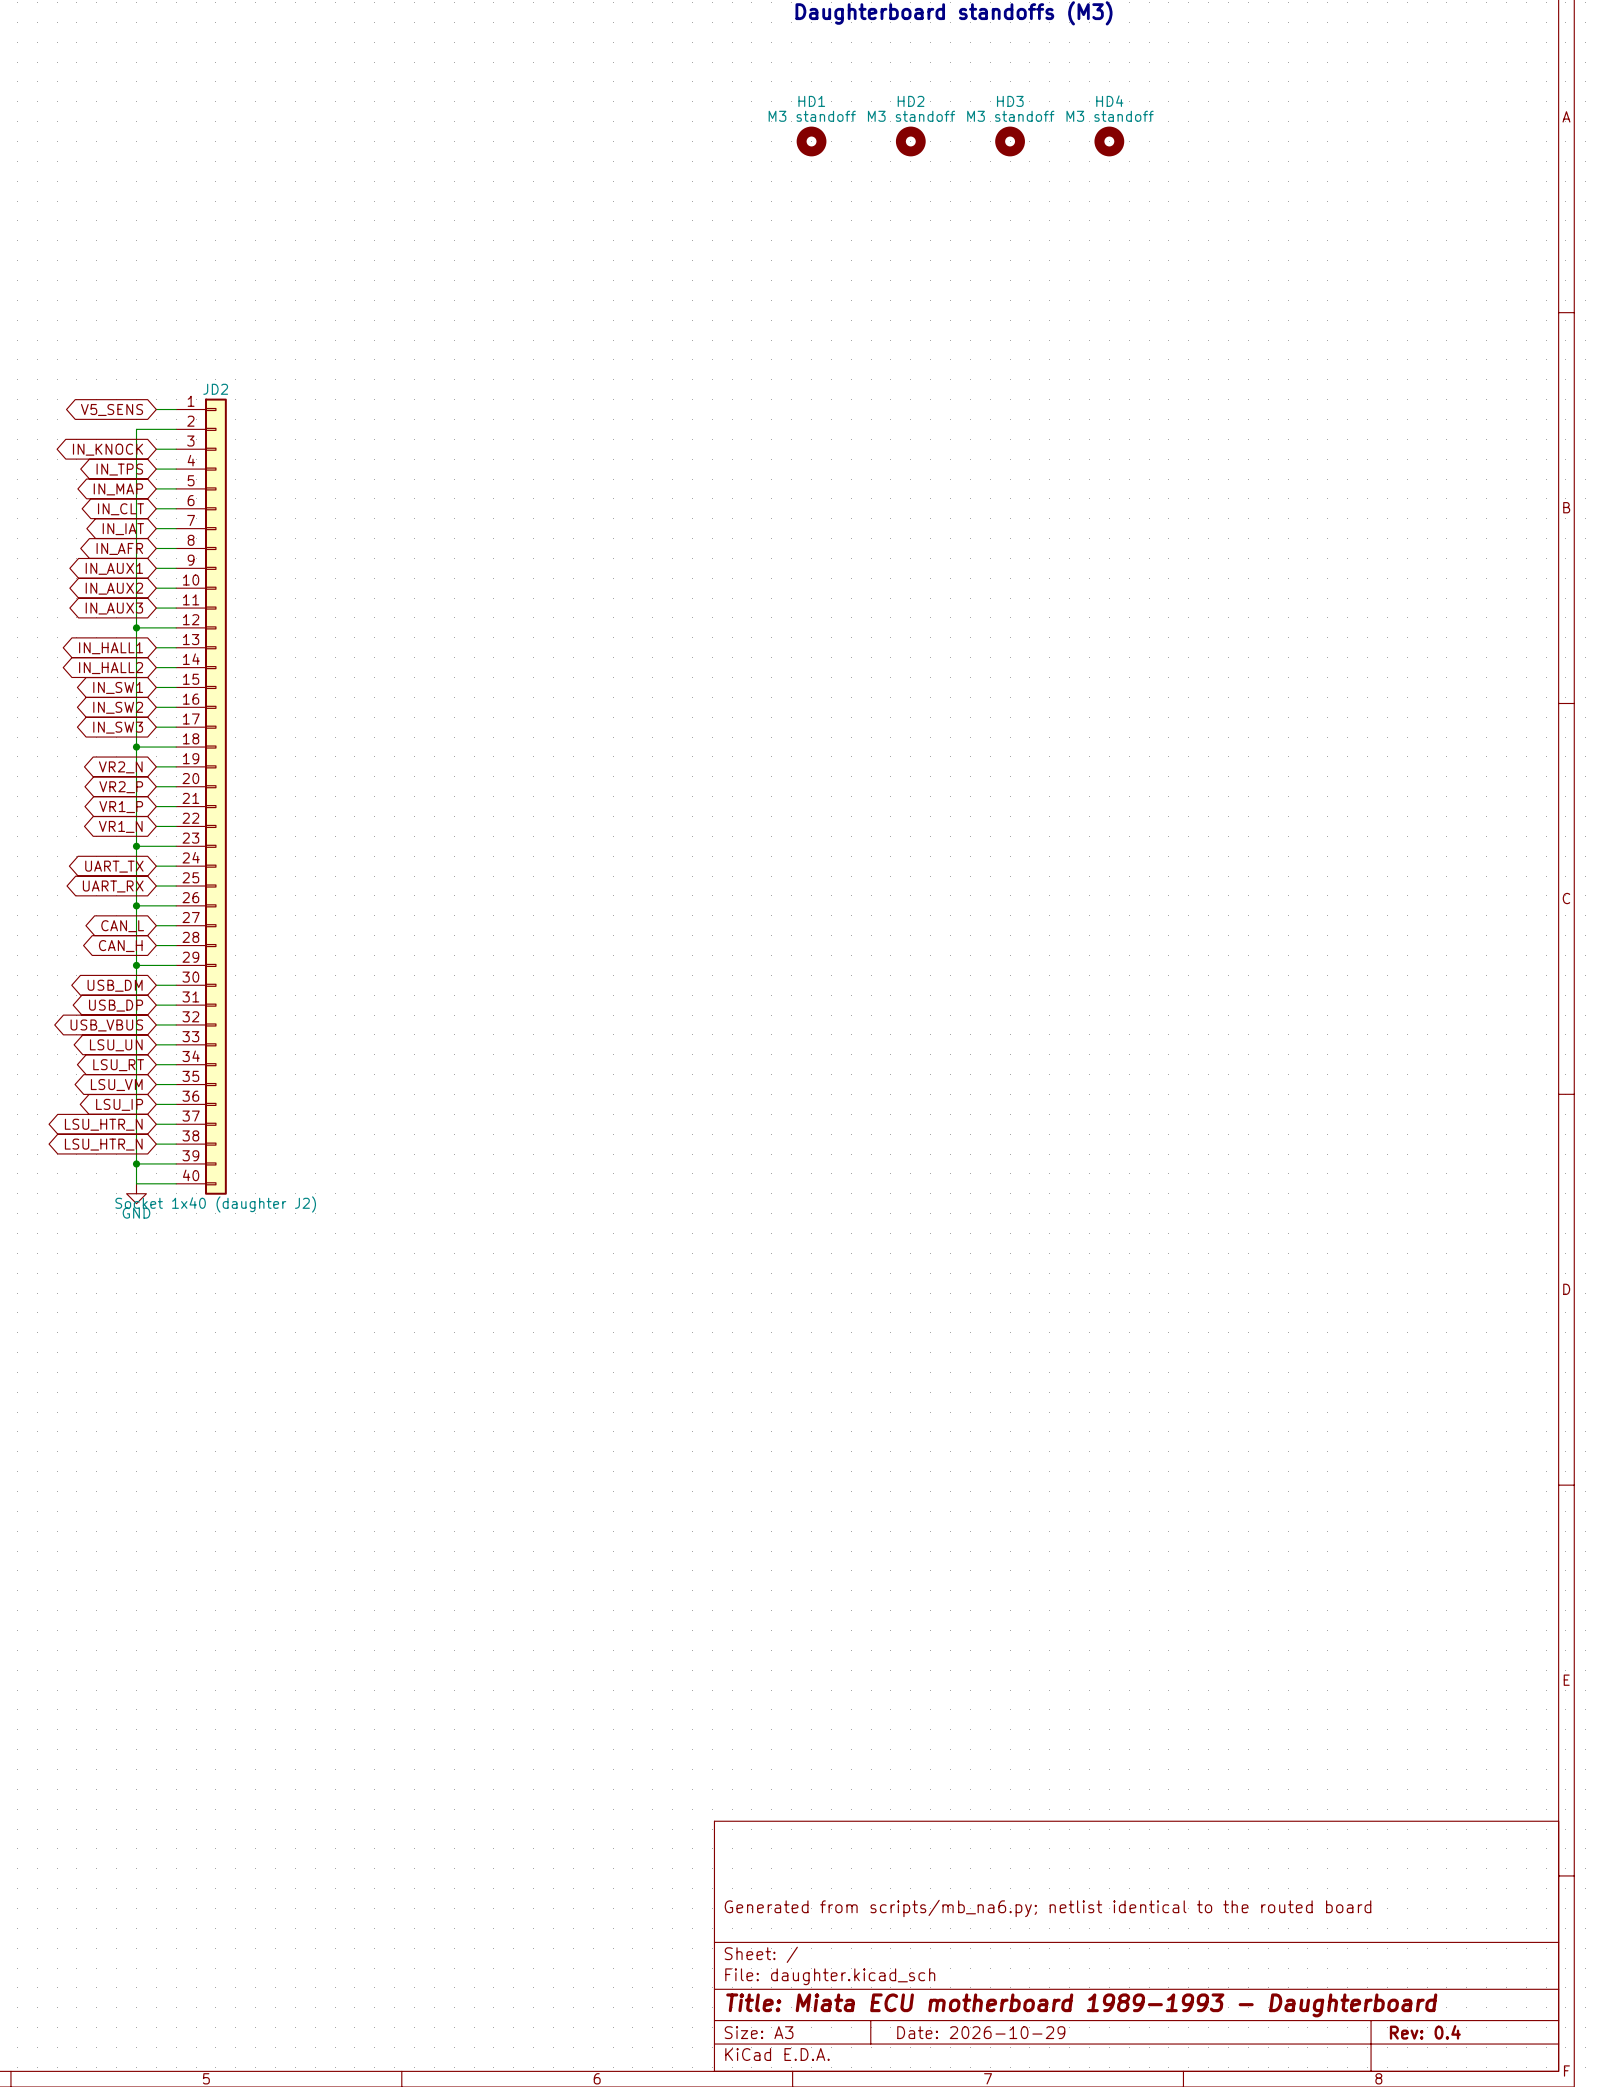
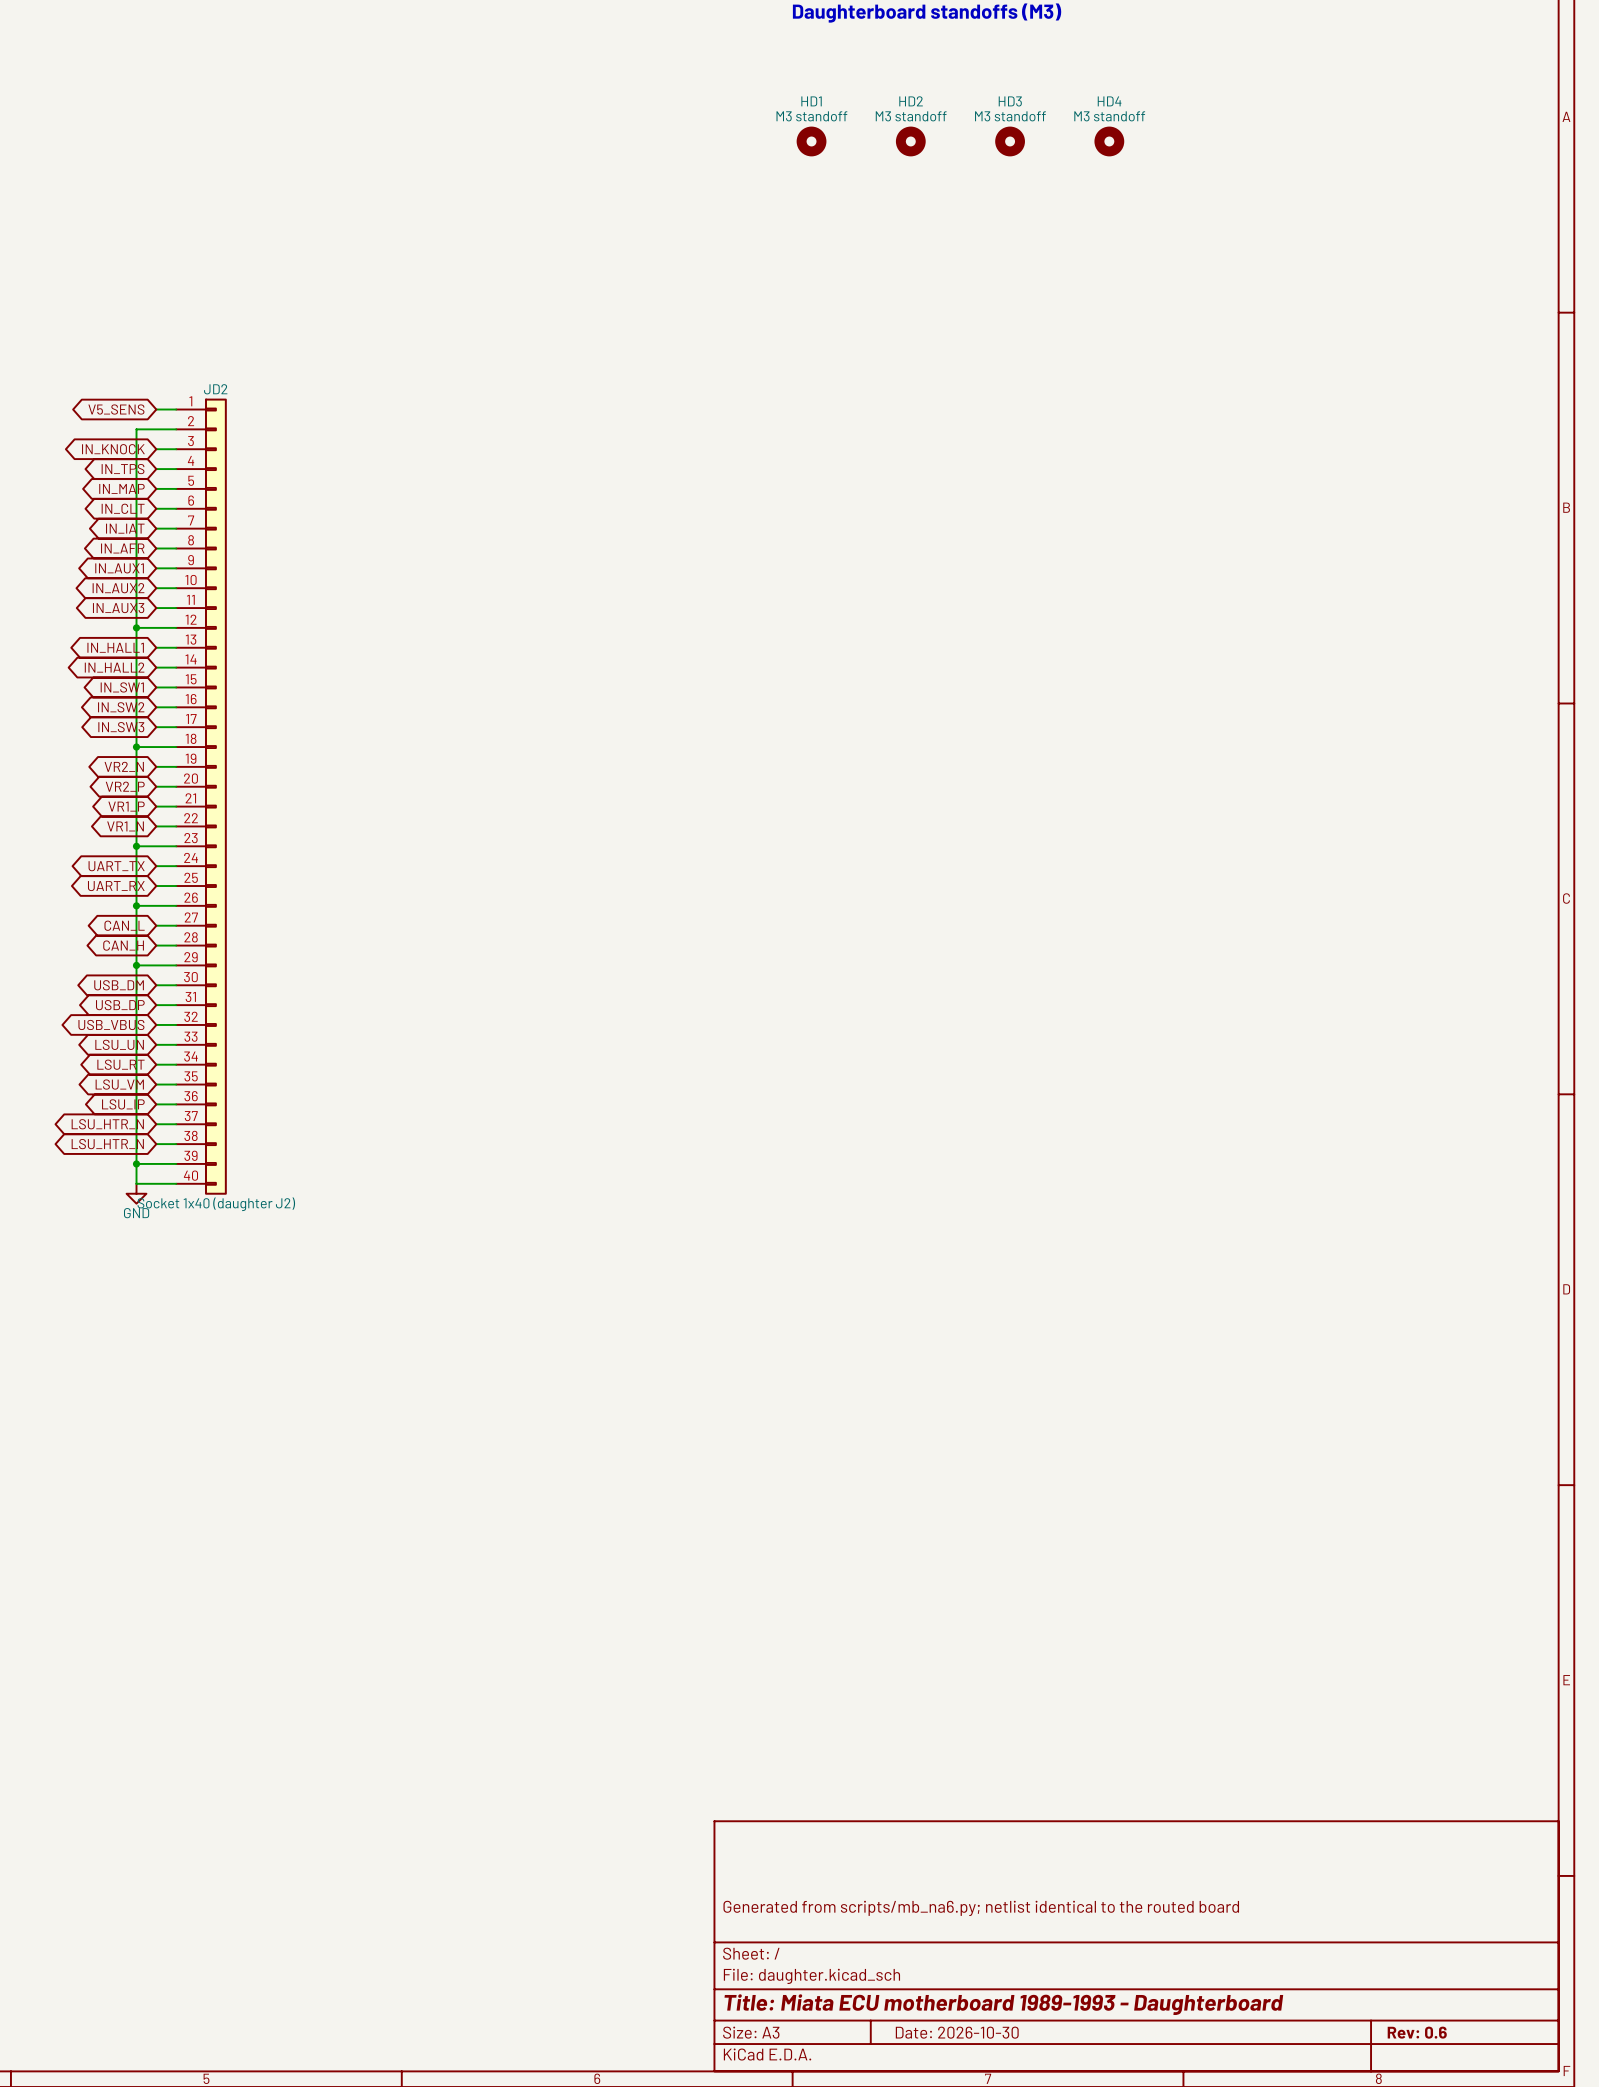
title block: Date: 2026-10-29 (981, 2032) -> Date: 2026-10-30 (957, 2032)
title block: Rev: 0.4 (1425, 2032) -> Rev: 0.6 (1417, 2032)

